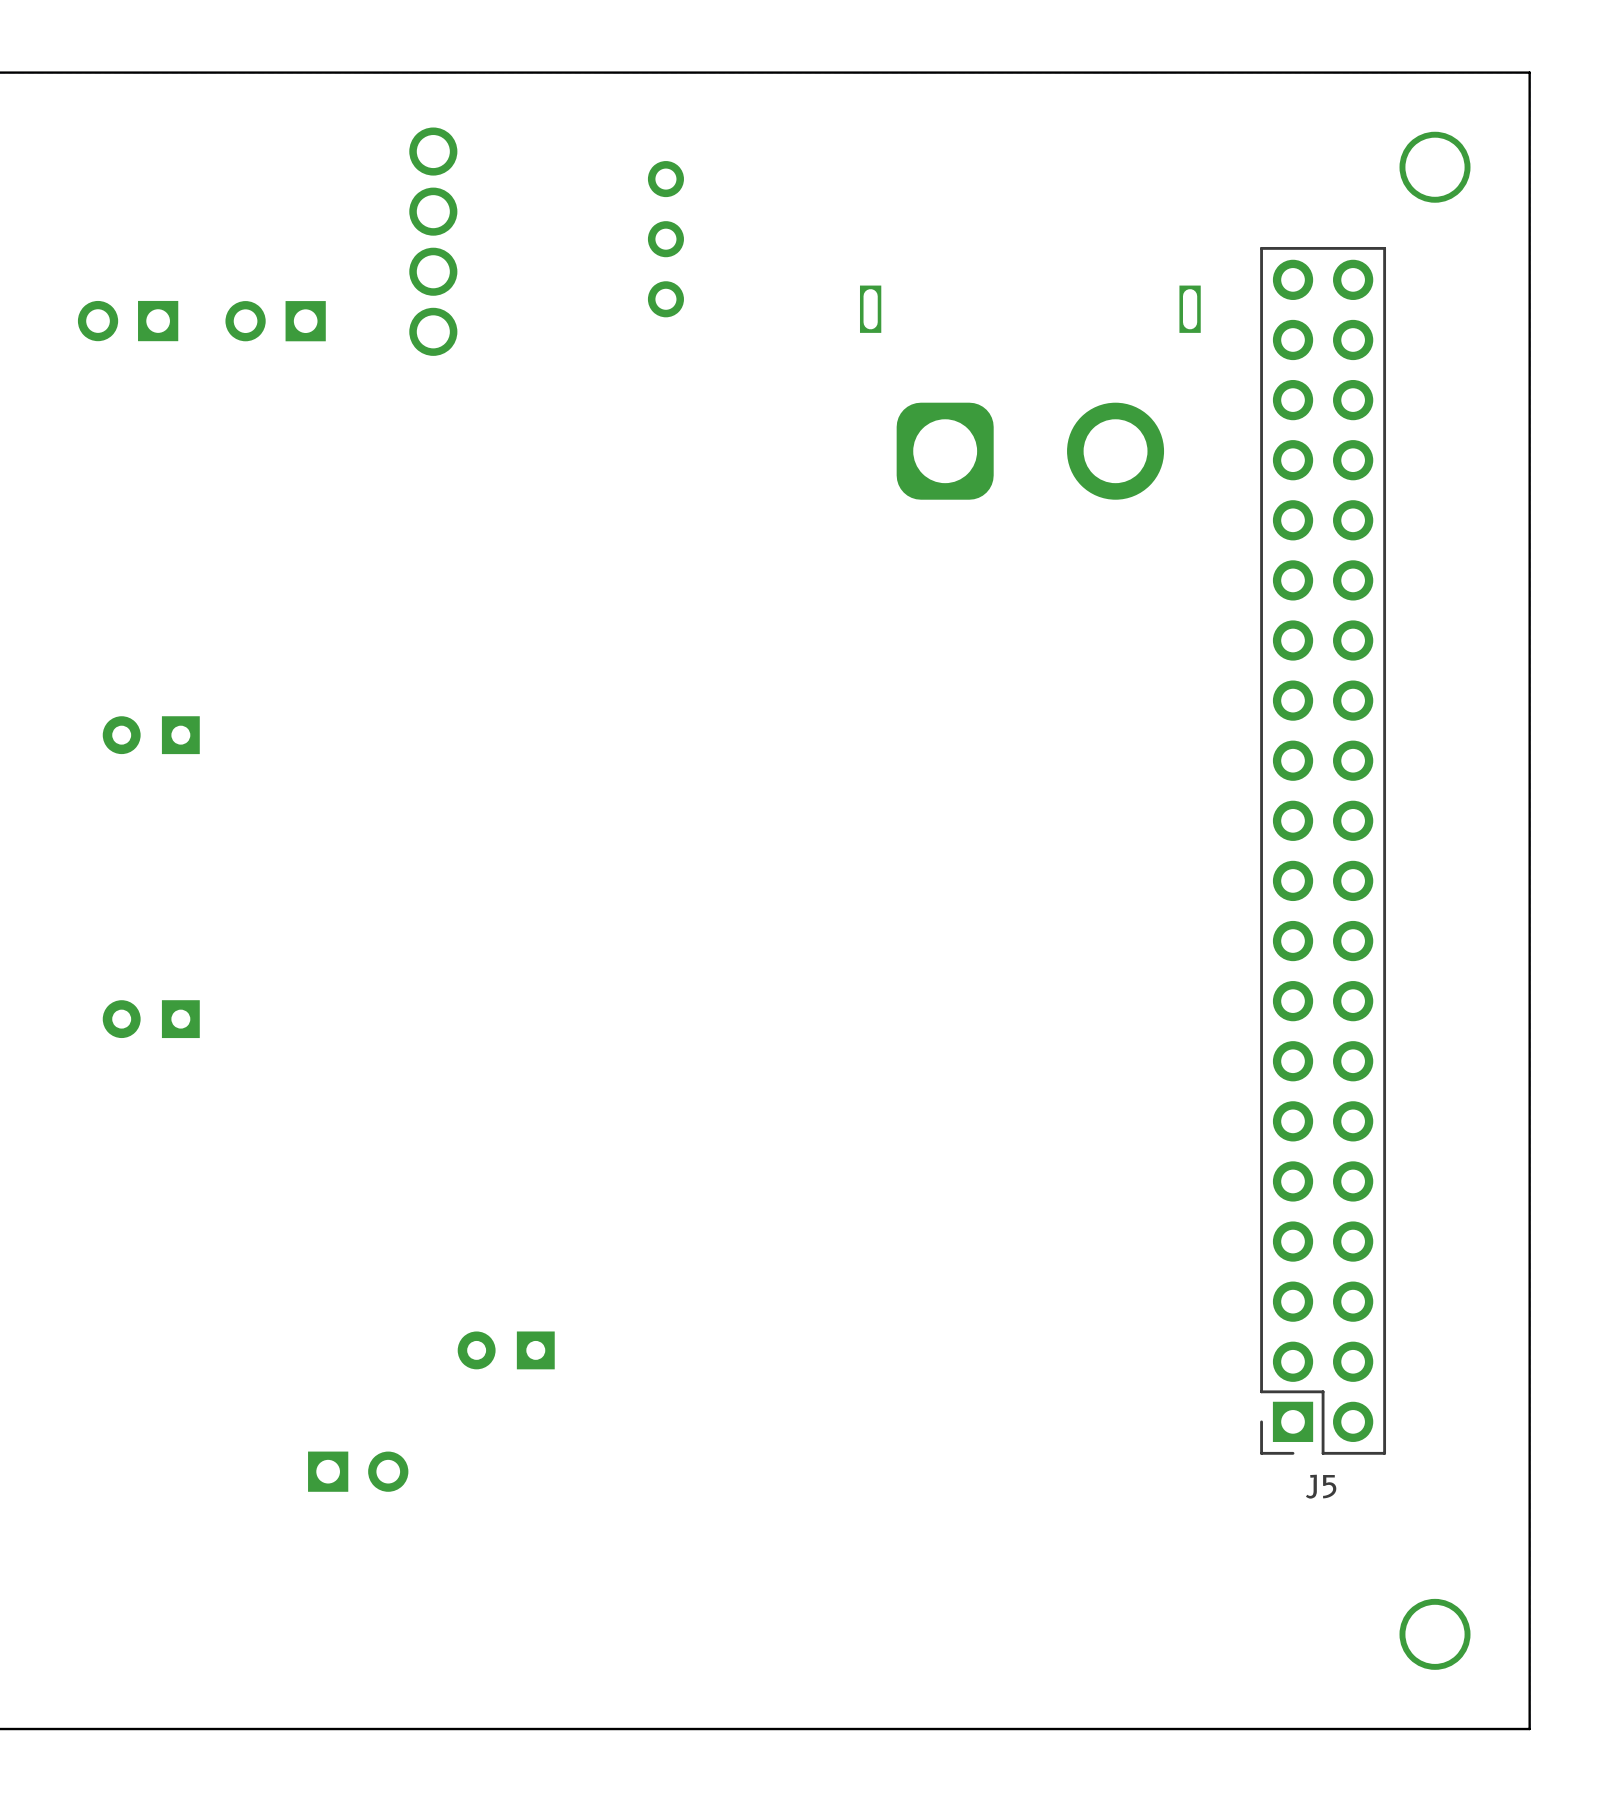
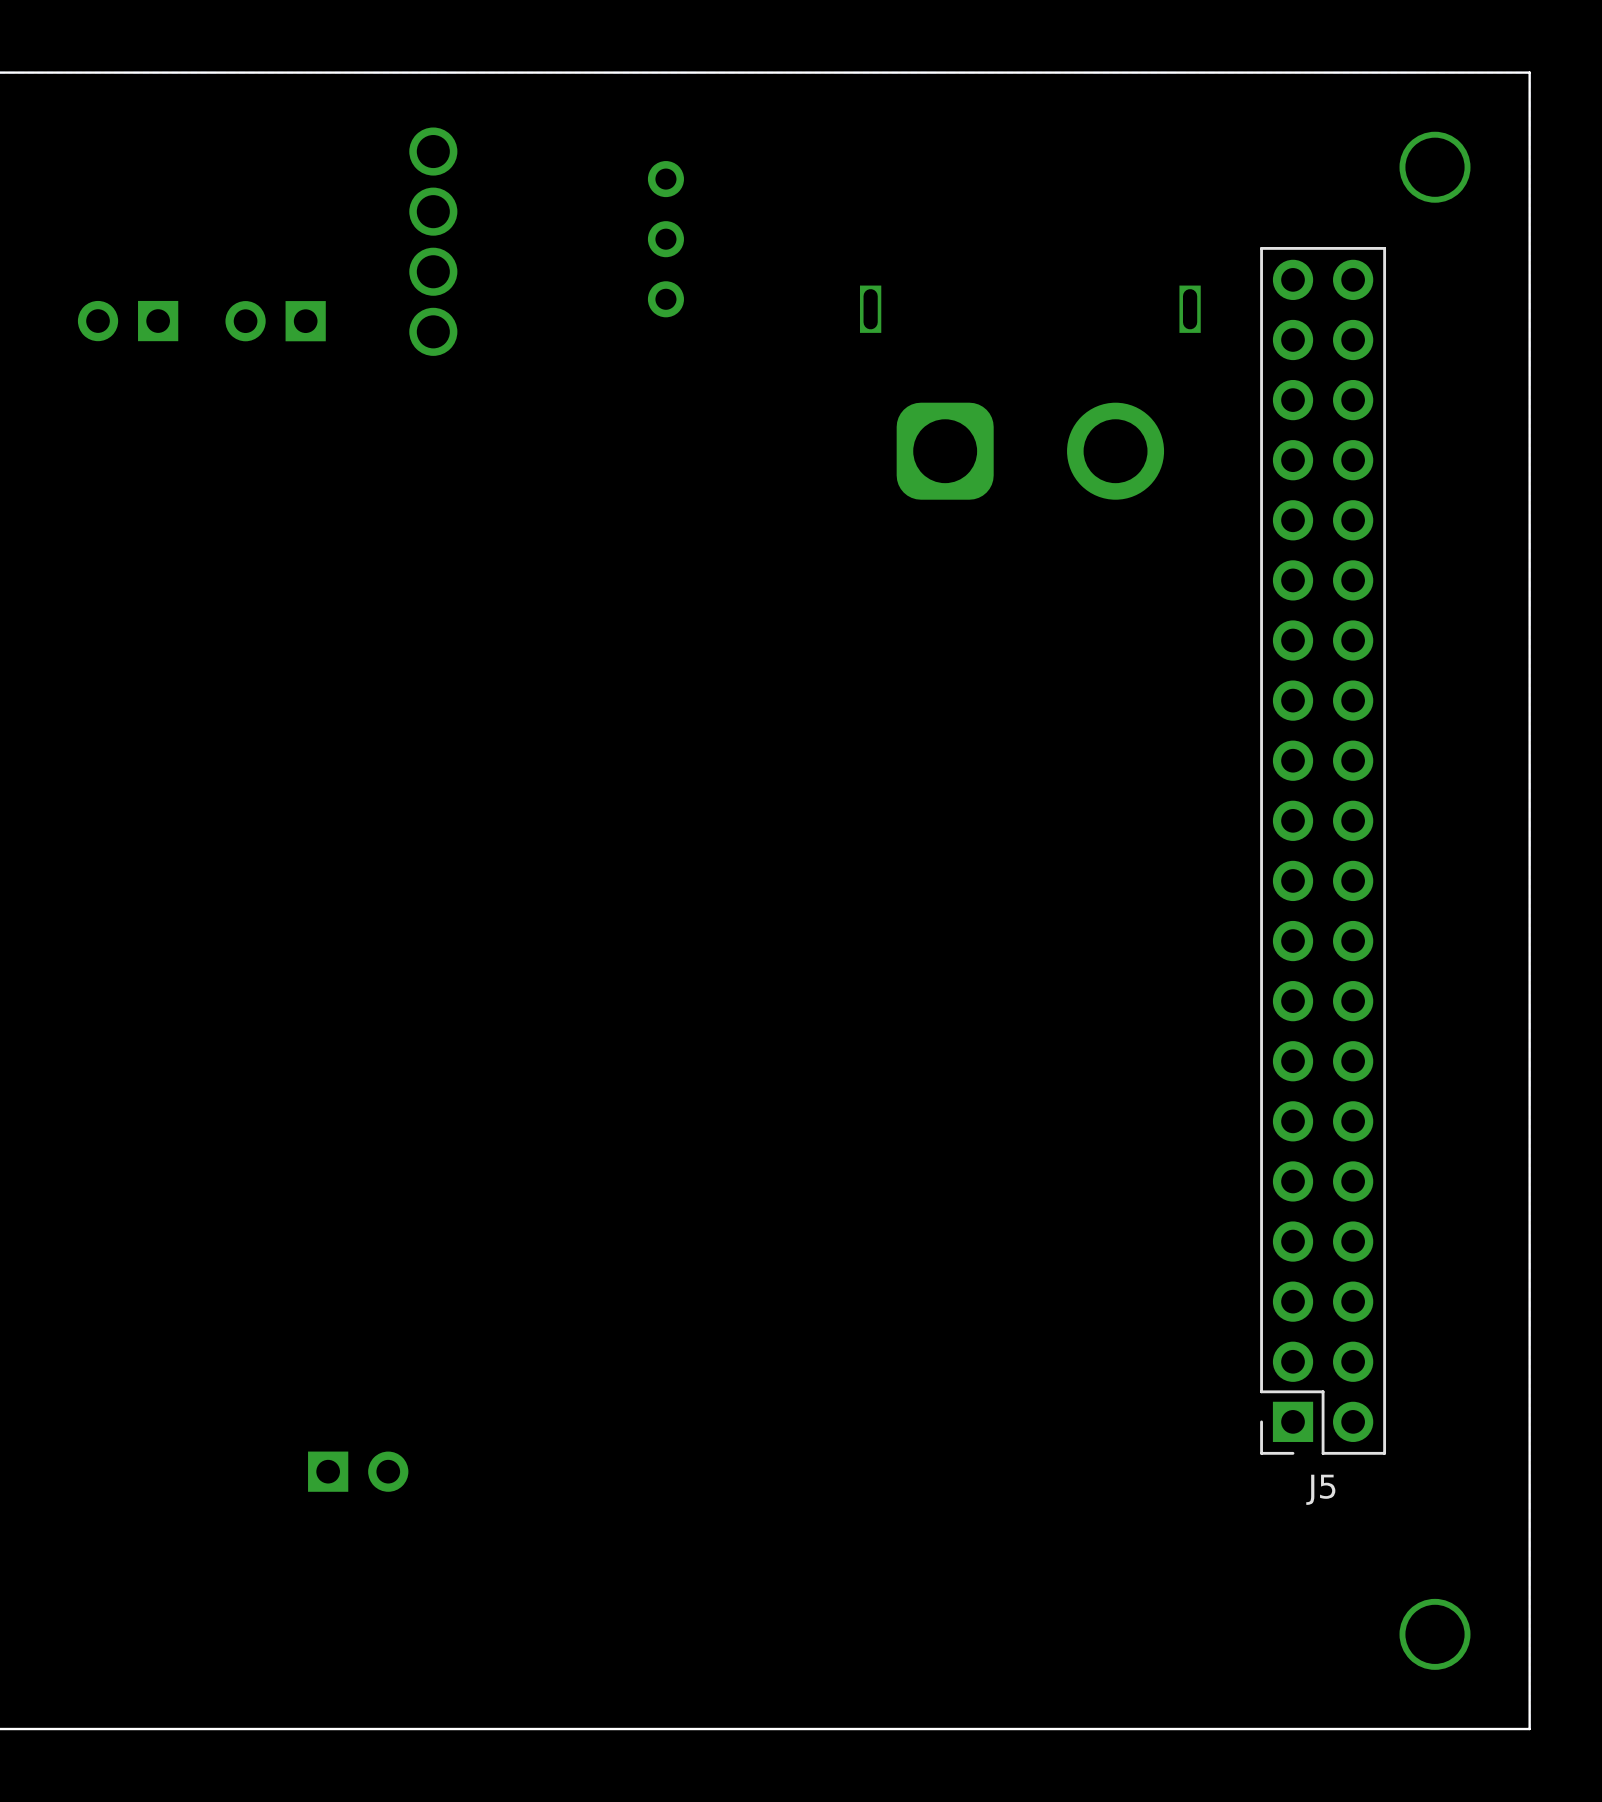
part: (151, 735) -> none
part: (151, 1019) -> none
part: (506, 1350) -> none

